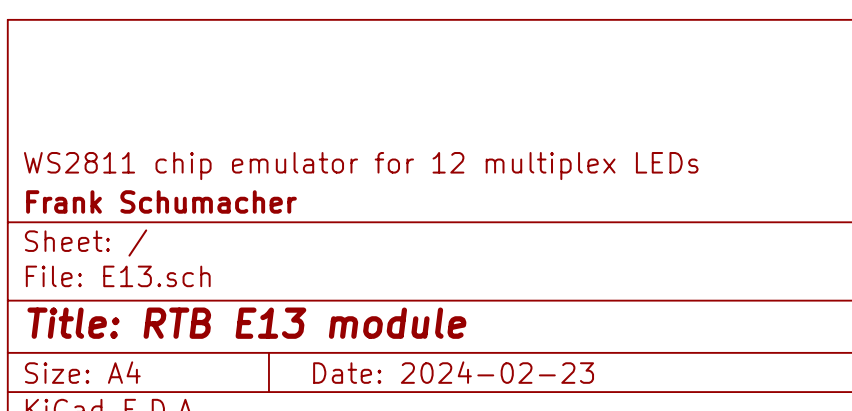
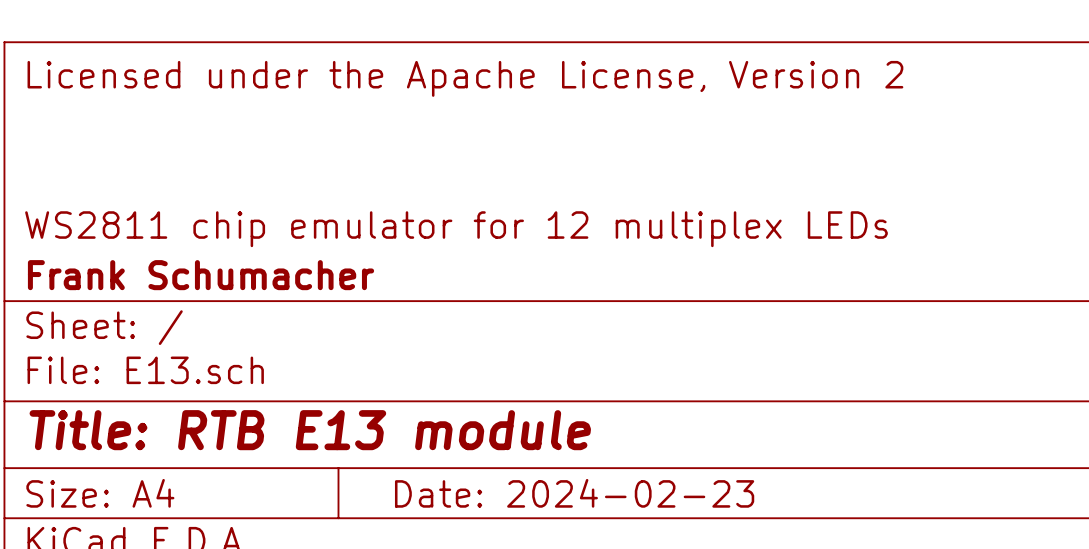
title block: none -> Licensed under the Apache License, Version 2 (465, 78)

